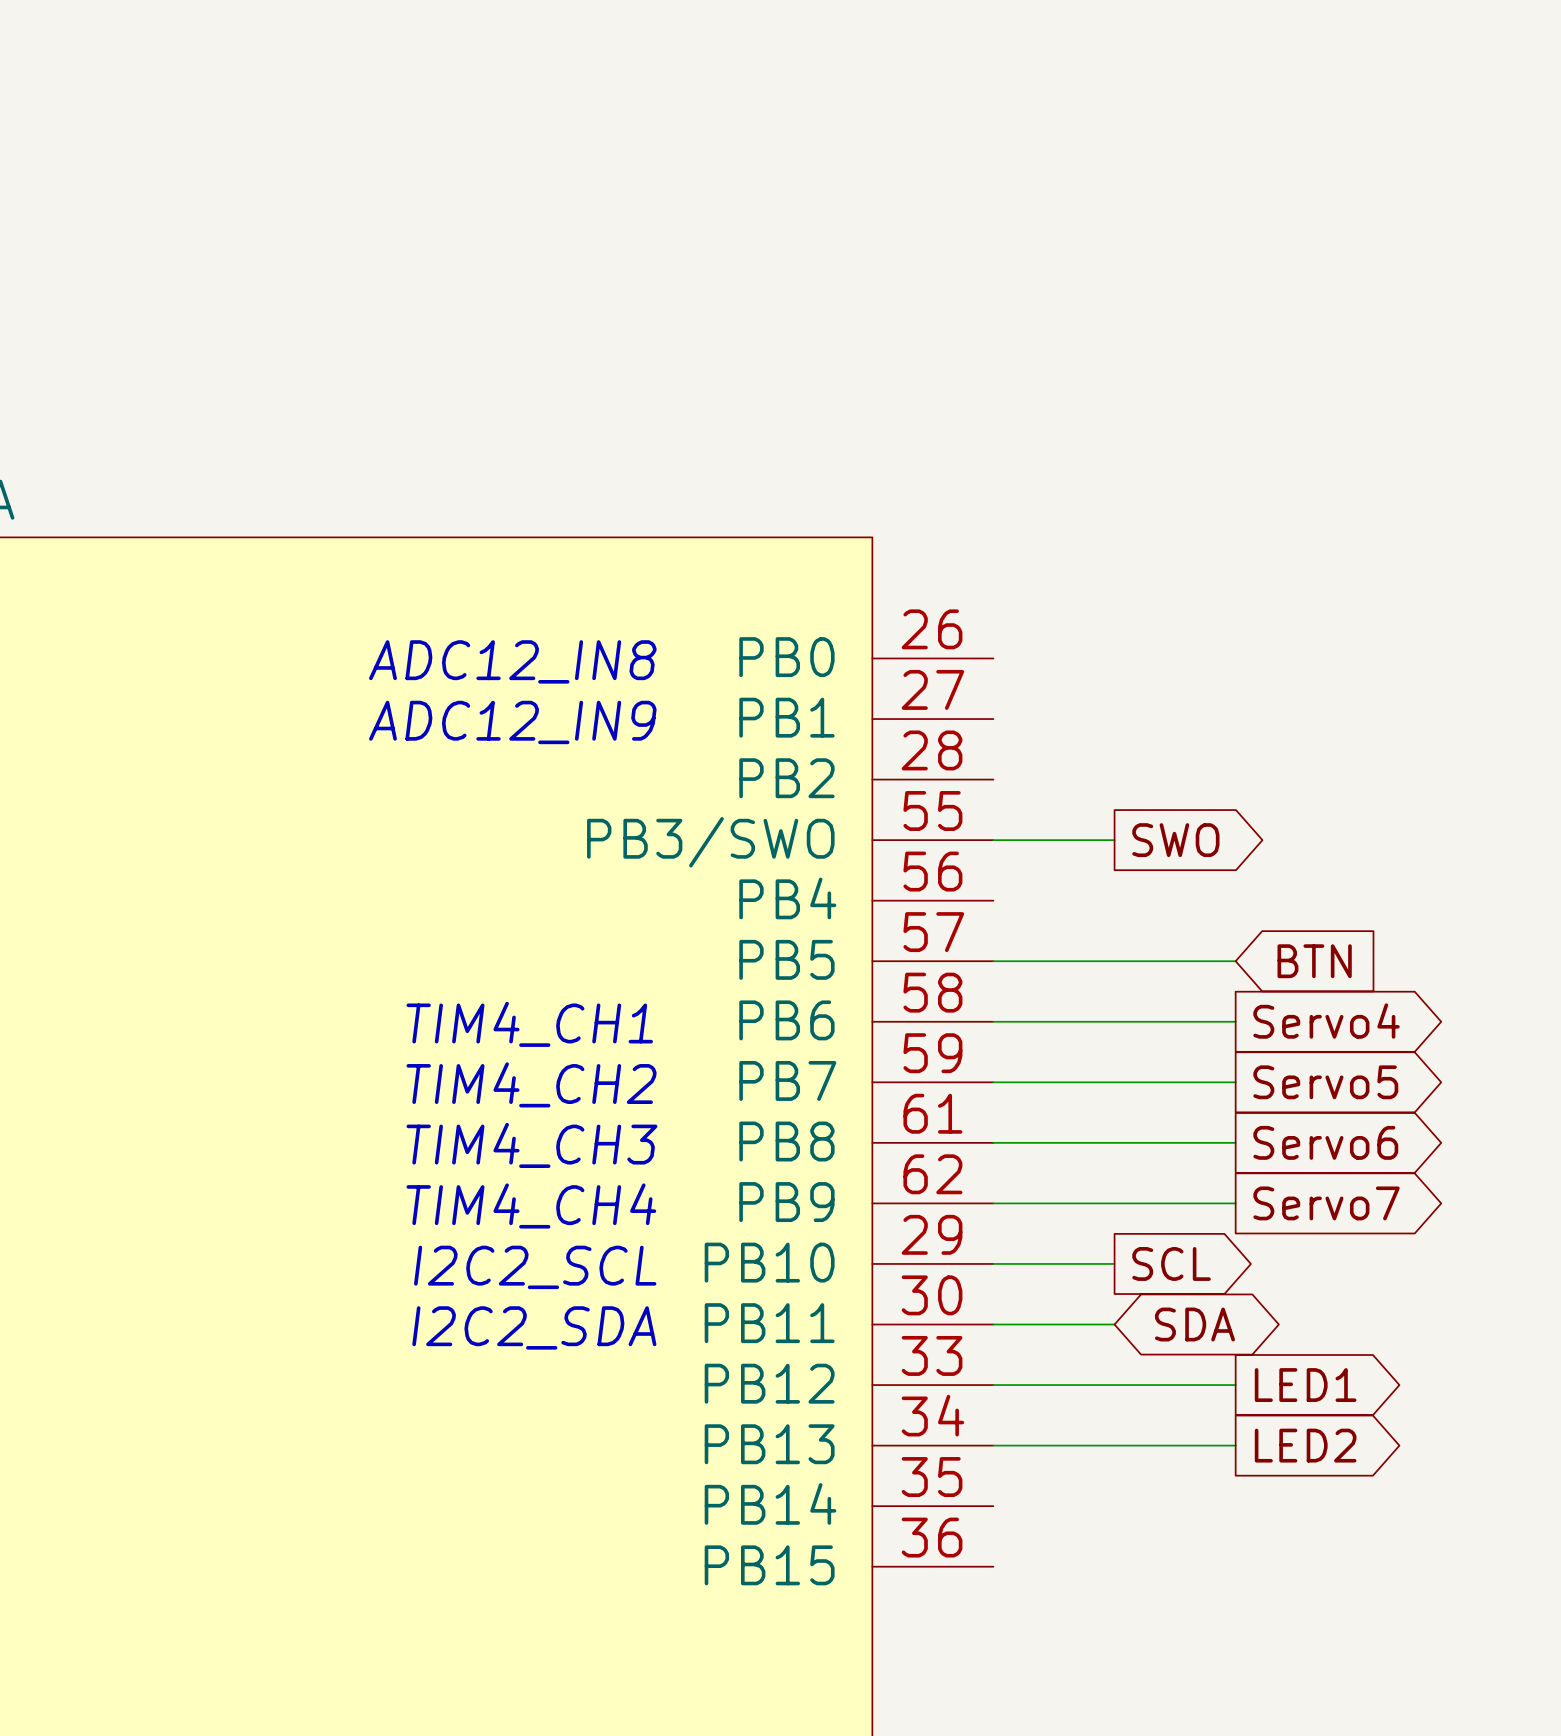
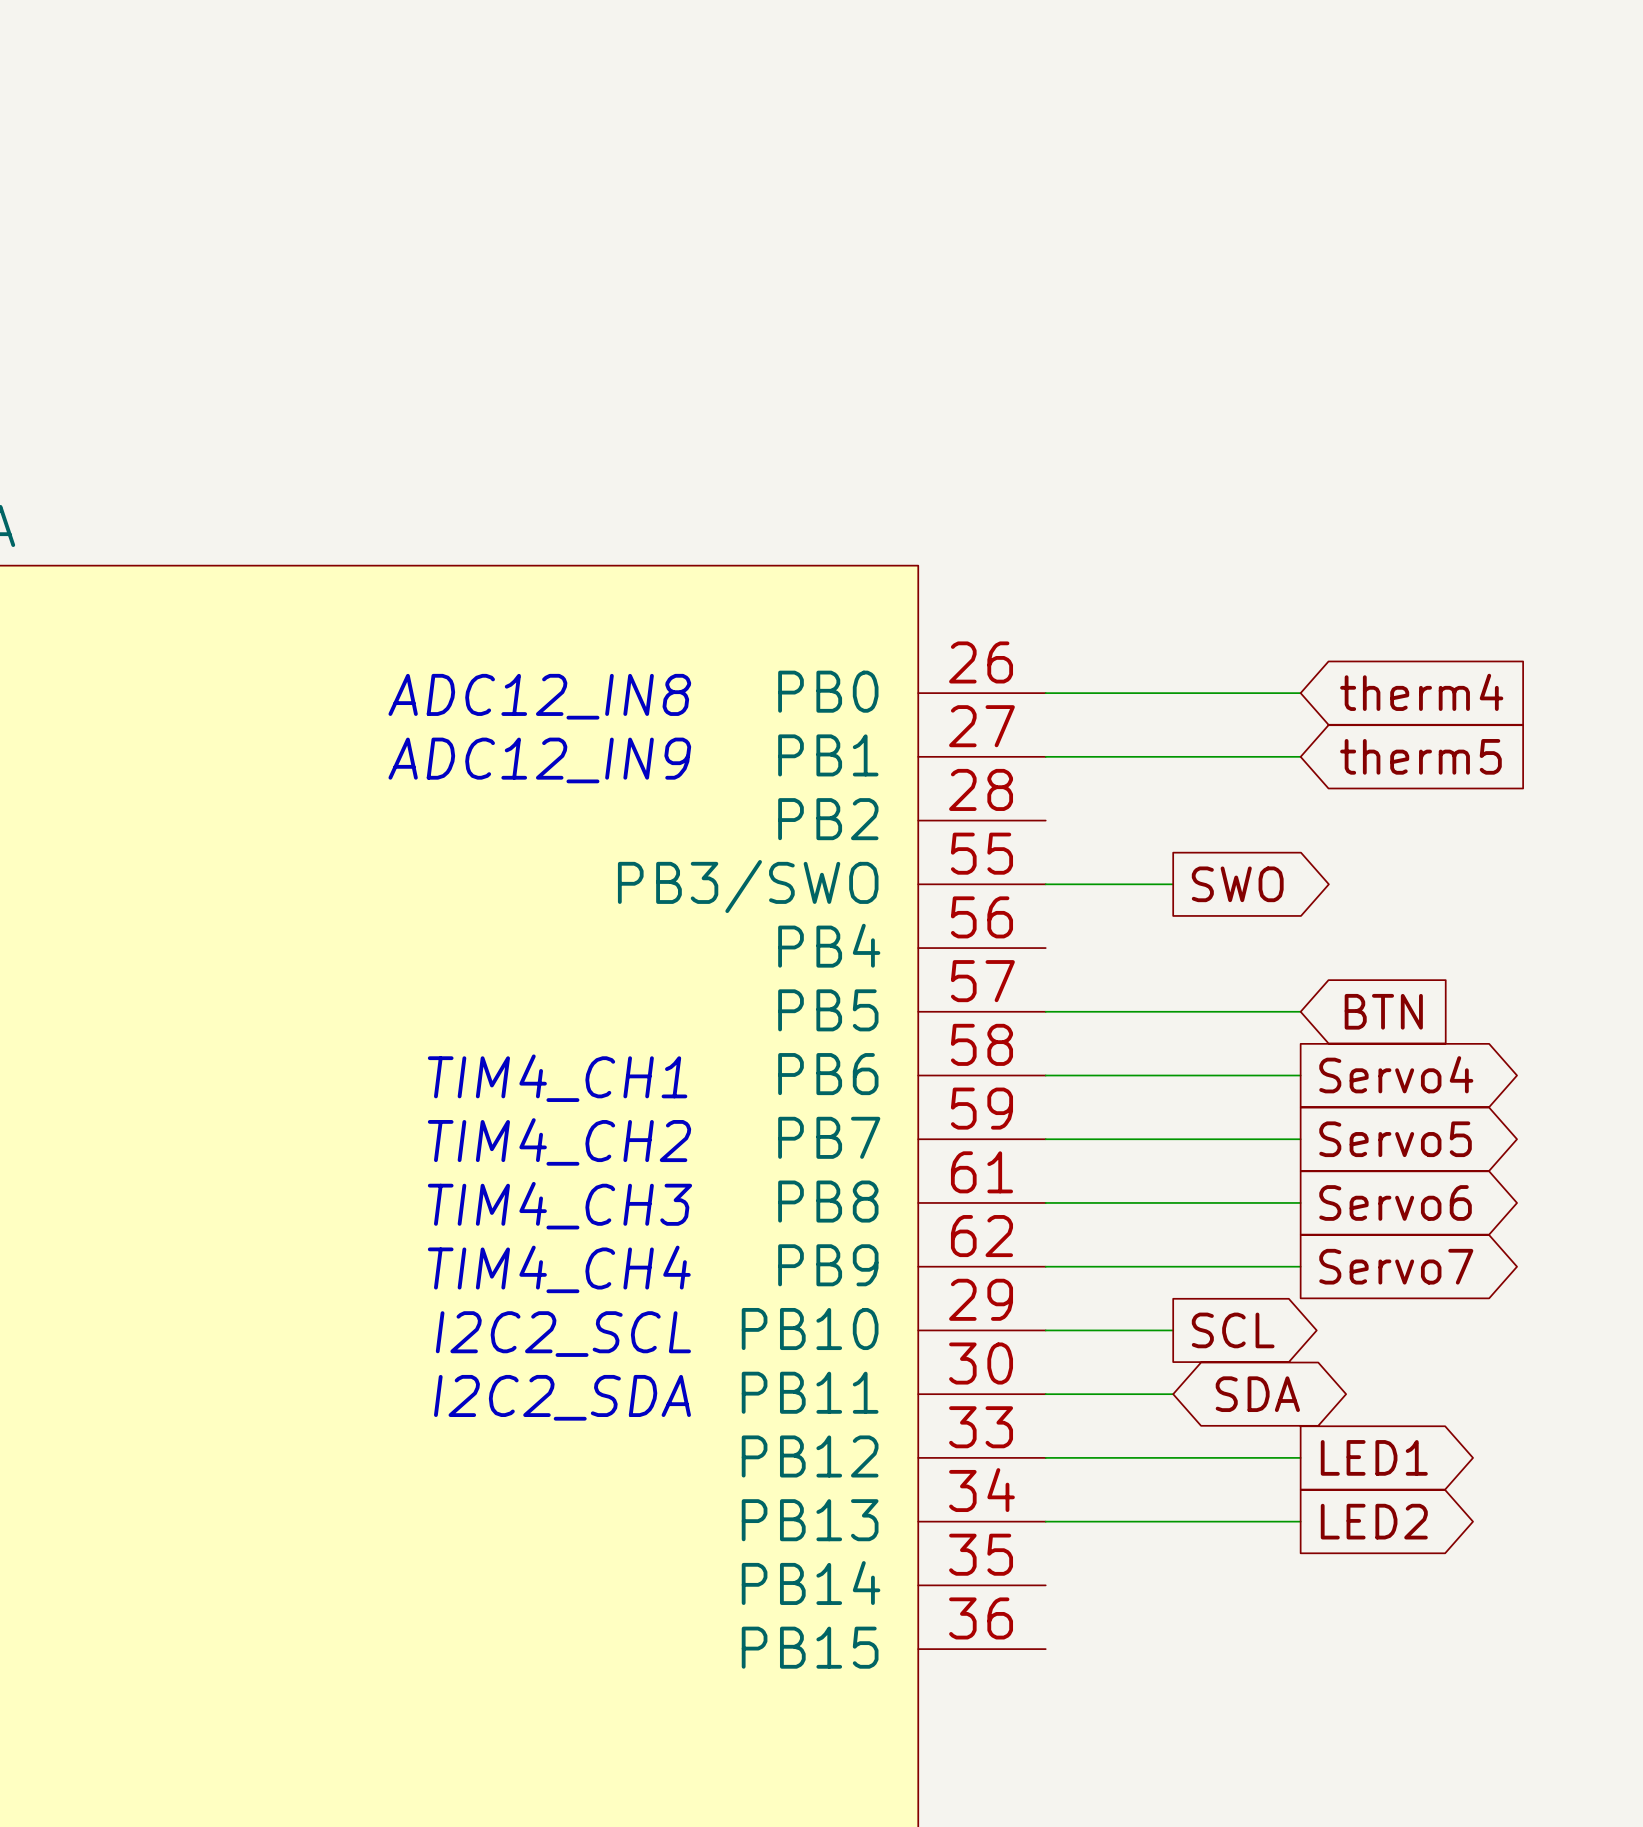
global label: none -> therm4 (1421, 692)
wire: none -> (1045, 693) (1300, 693)
wire: none -> (1045, 756) (1300, 756)
global label: none -> therm5 (1420, 756)

